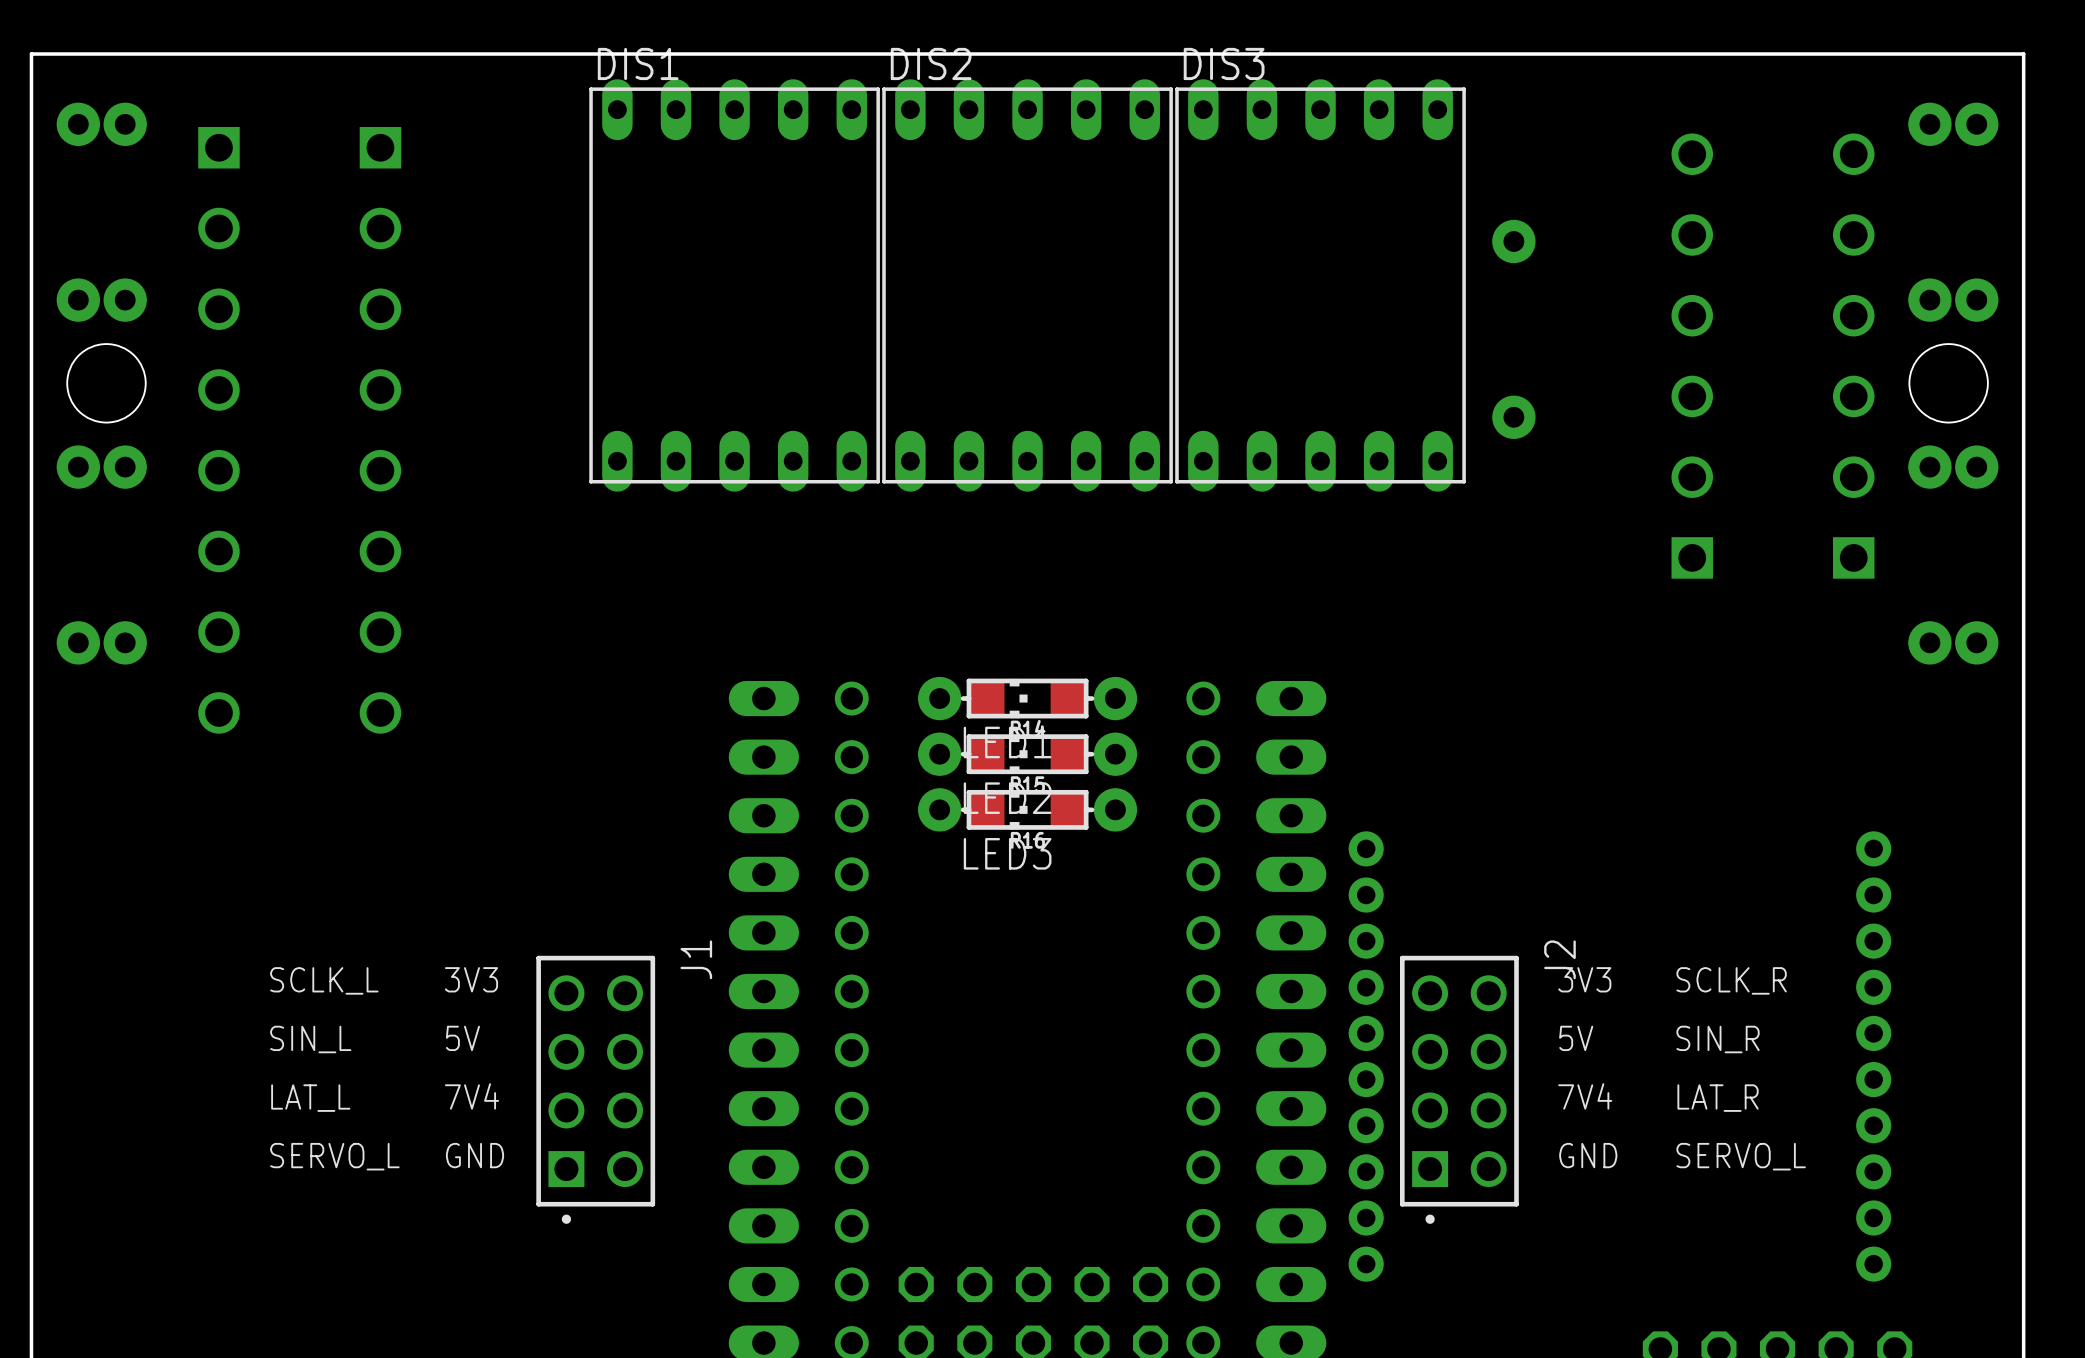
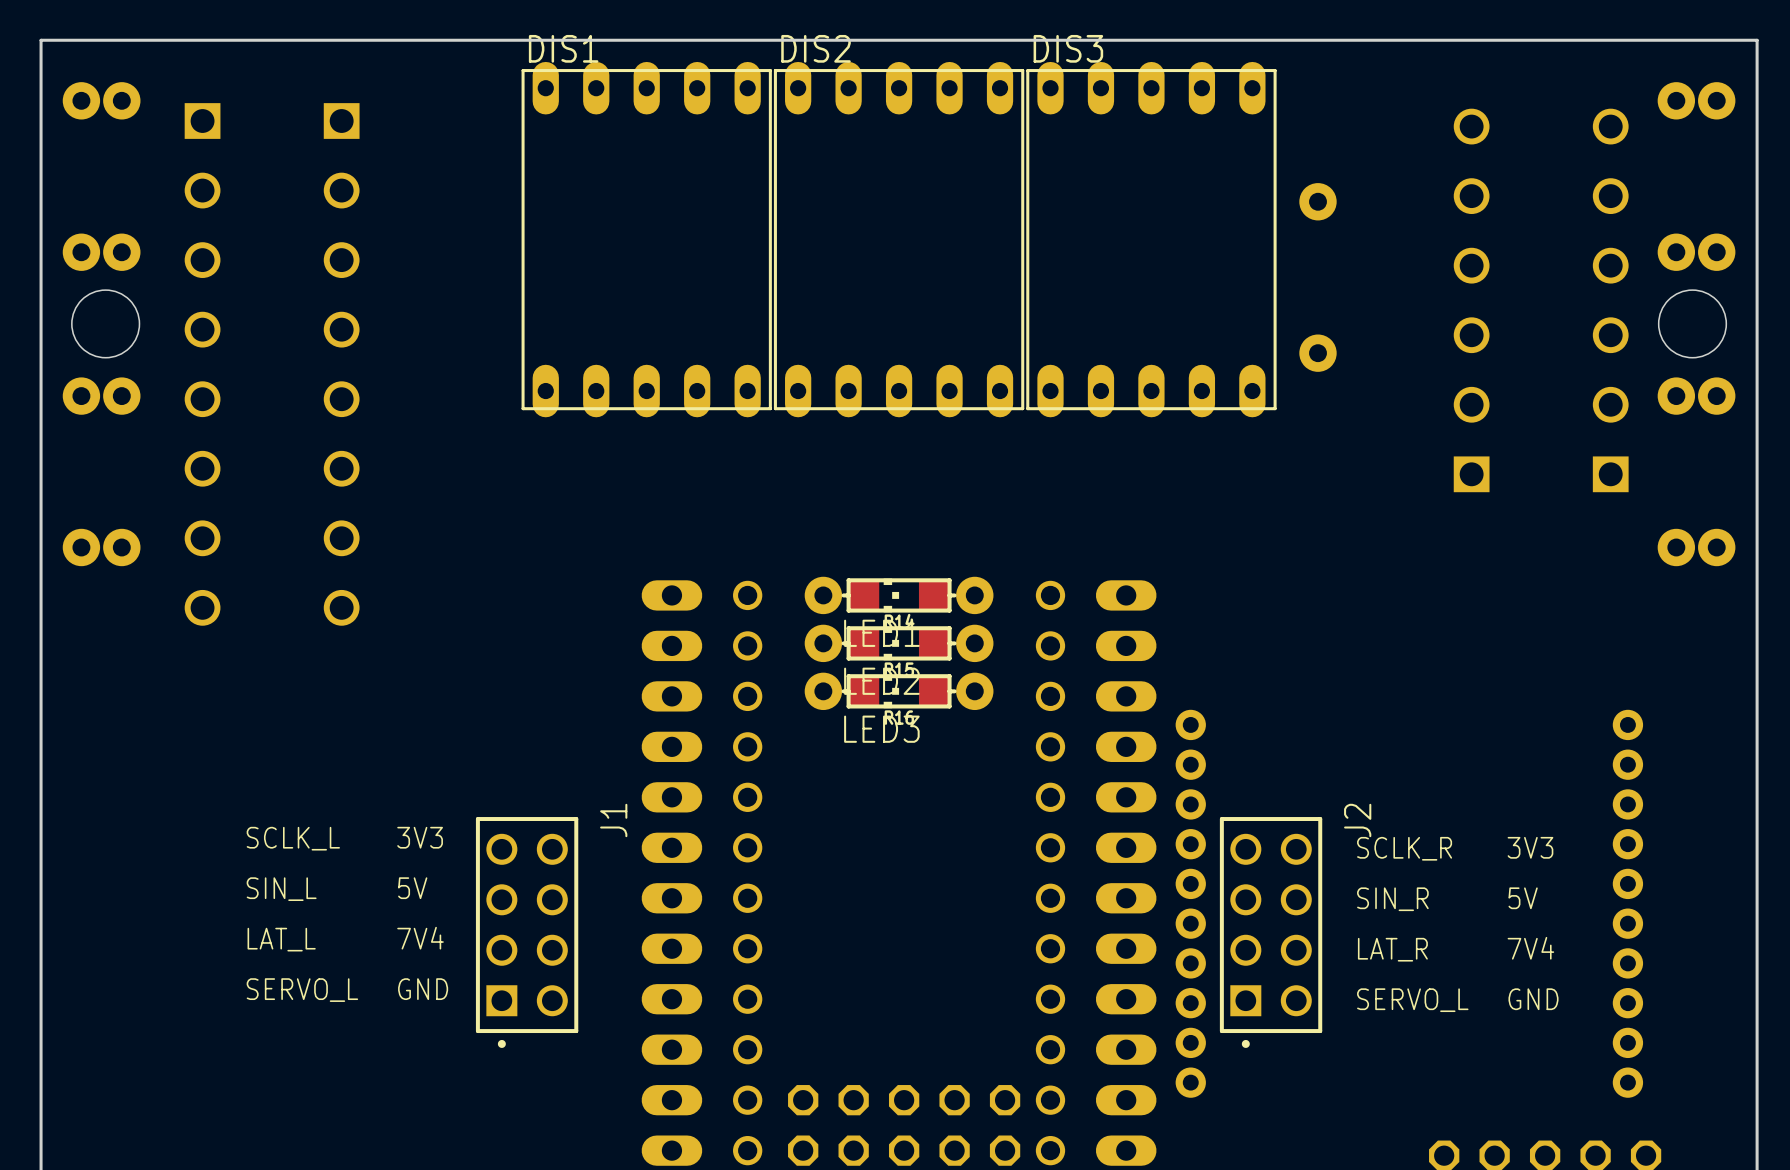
text position: 3V3 (1584, 979) -> 3V3 (1530, 847)
text position: SCLK_R (1731, 980) -> SCLK_R (1404, 848)
text position: 5V (1576, 1038) -> 5V (1523, 898)
text position: SIN_R (1718, 1039) -> SIN_R (1392, 899)
text position: 7V4 (1585, 1096) -> 7V4 (1530, 948)
text position: LAT_R (1718, 1098) -> LAT_R (1392, 949)
text position: GND (1588, 1155) -> GND (1533, 999)
text position: SERVO_L (1741, 1156) -> SERVO_L (1412, 1000)

